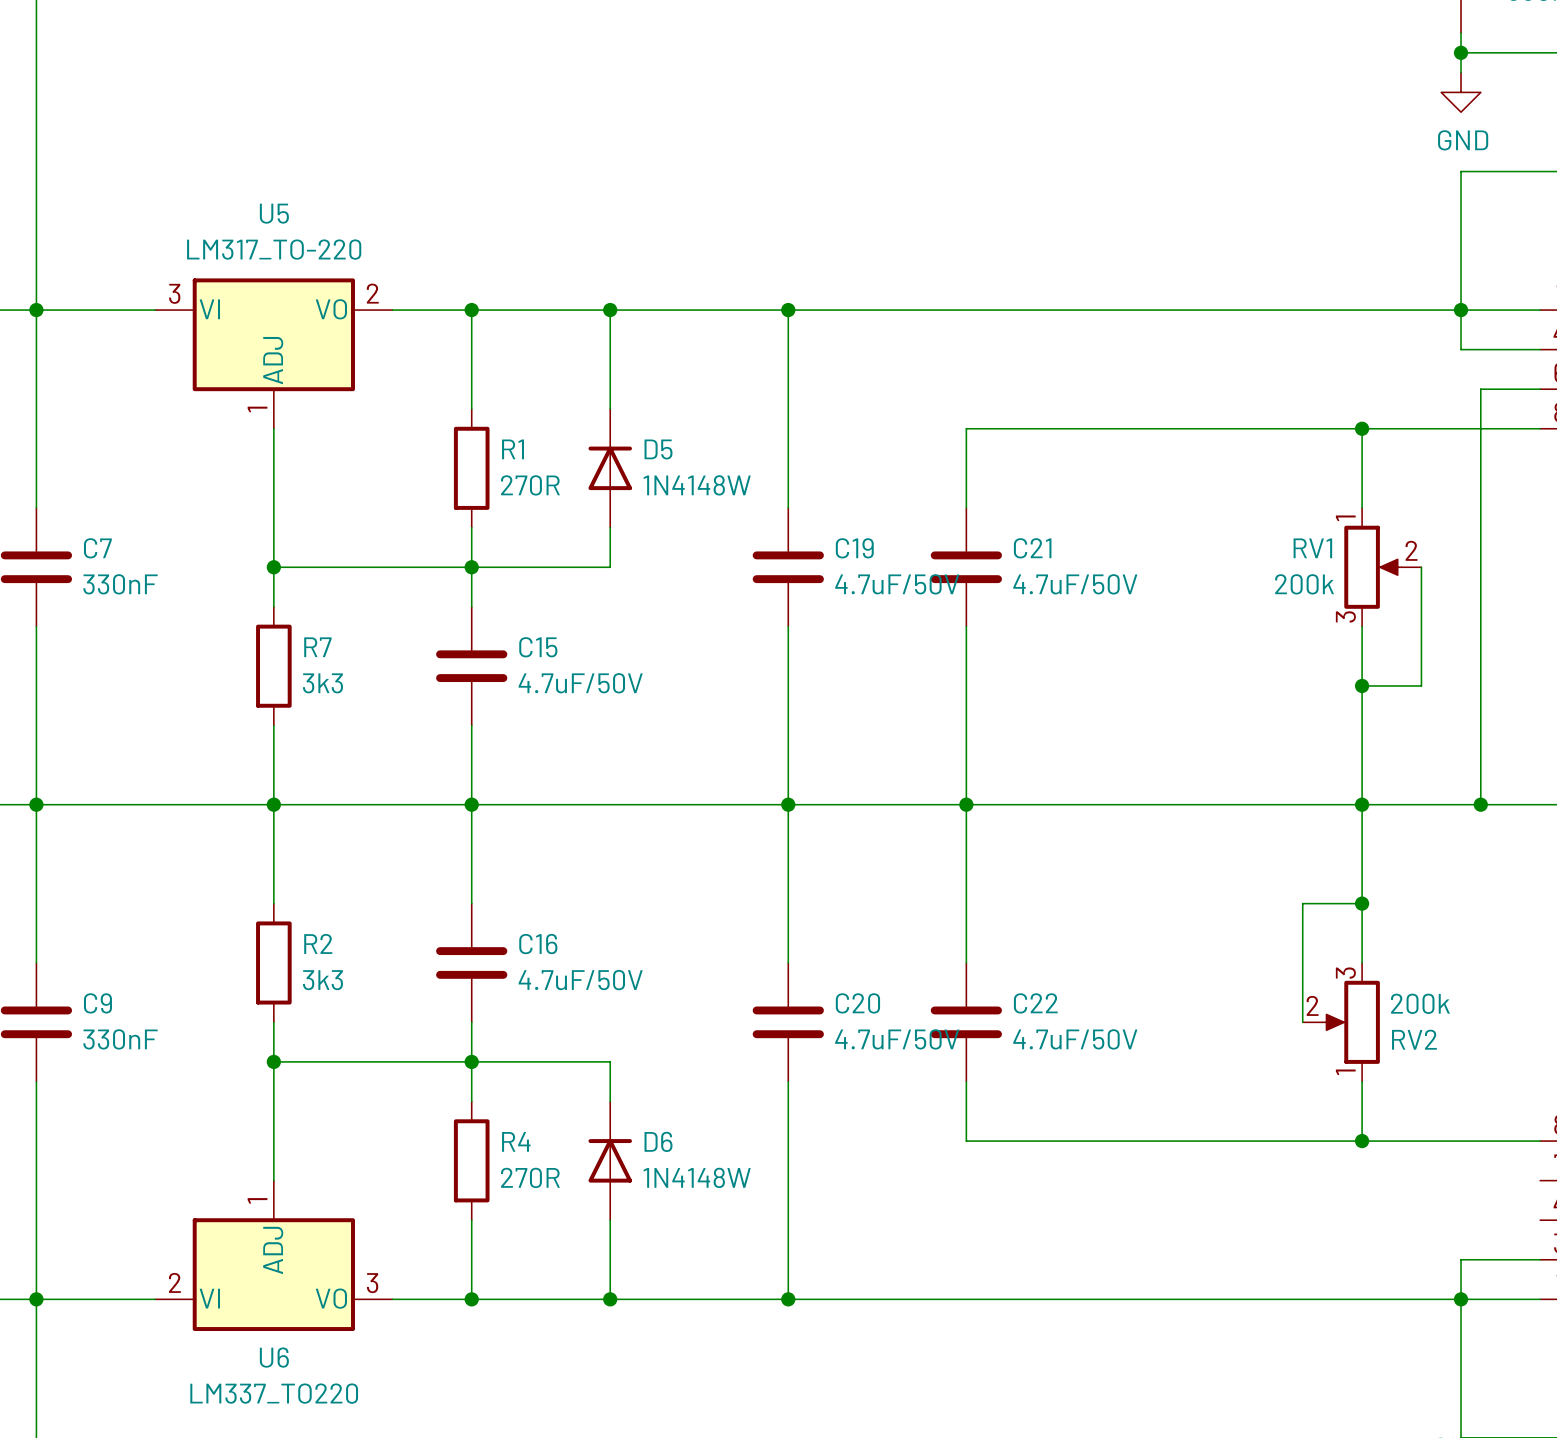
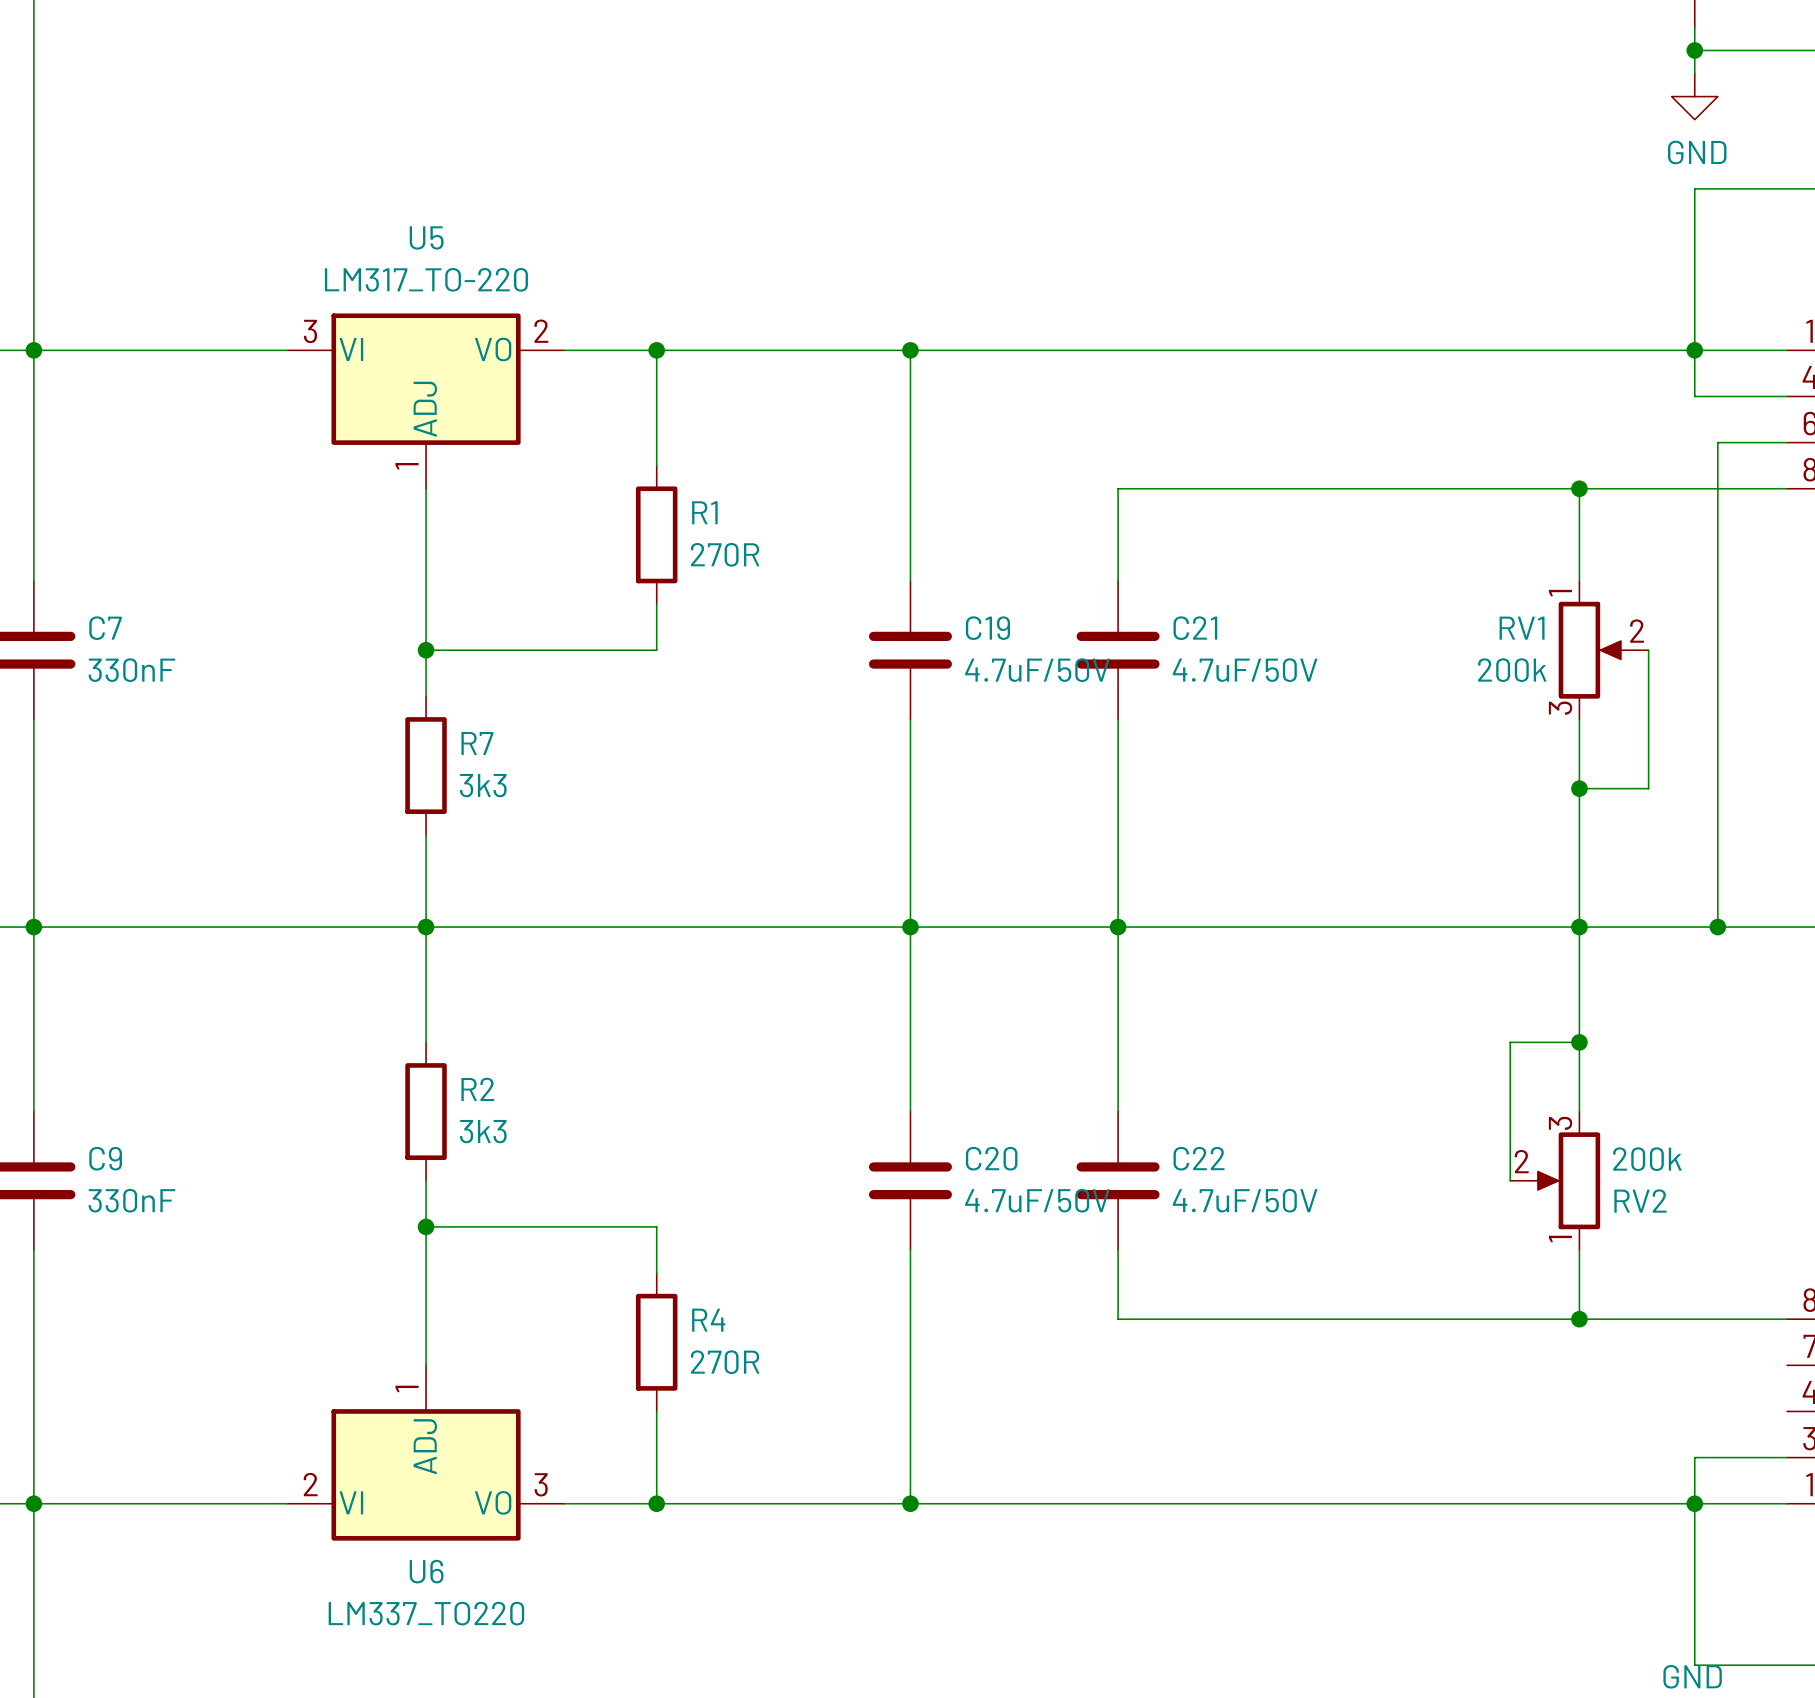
wire: (471, 310) (471, 408) -> (656, 350) (656, 465)
junction: (471, 310) -> none
wire: (610, 310) (610, 408) -> none
junction position: (610, 310) -> (656, 350)
U5 position: (273, 353) -> (426, 401)
wire: (273, 428) (273, 606) -> (426, 488) (426, 696)
R1 position: (471, 468) -> (656, 534)
D5: 1N4148W (610, 468) -> none
wire: (471, 527) (471, 606) -> none
wire: (610, 527) (610, 567) (570, 567) -> (656, 604) (656, 650)
wire: (273, 567) (372, 567) -> none
junction: (273, 567) -> none
junction: none -> (426, 650)
junction: (471, 567) -> none
R7 position: (273, 666) -> (426, 765)
C15: 4.7uF/50V (471, 666) -> none
wire: (273, 725) (273, 903) -> (426, 834) (426, 1042)
wire: (471, 725) (471, 903) -> none
junction: (273, 804) -> none
junction: none -> (426, 927)
junction: (471, 804) -> none
R2 position: (273, 962) -> (426, 1111)
C16: 4.7uF/50V (471, 962) -> none
wire: (273, 1022) (273, 1180) -> (426, 1180) (426, 1365)
wire: (471, 1022) (471, 1101) -> none
wire: (273, 1061) (372, 1061) -> none
junction: (273, 1061) -> none
junction: none -> (426, 1226)
junction: (471, 1061) -> none
wire: (570, 1061) (610, 1061) (610, 1101) -> (656, 1226) (656, 1273)
R4 position: (471, 1160) -> (656, 1342)
D6: 1N4148W (610, 1160) -> none
wire: (471, 1220) (471, 1299) -> (656, 1411) (656, 1503)
wire: (610, 1220) (610, 1299) -> none
U6 position: (273, 1255) -> (426, 1452)
junction: (471, 1299) -> none
junction position: (610, 1299) -> (656, 1503)

